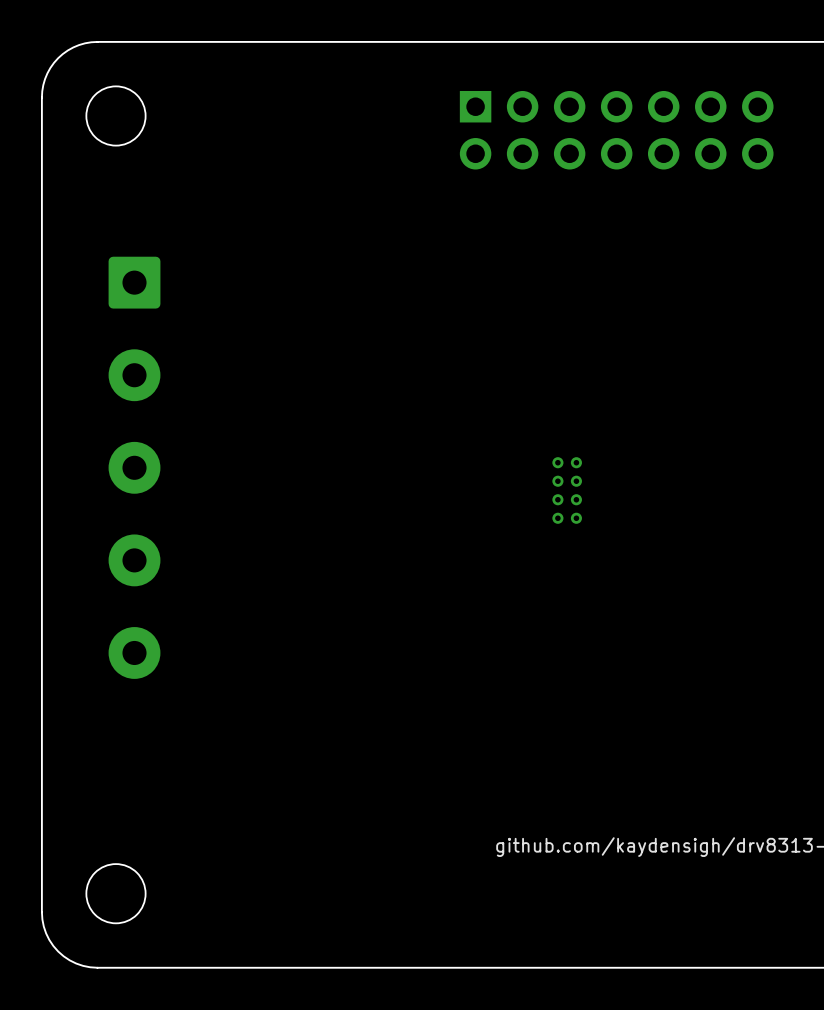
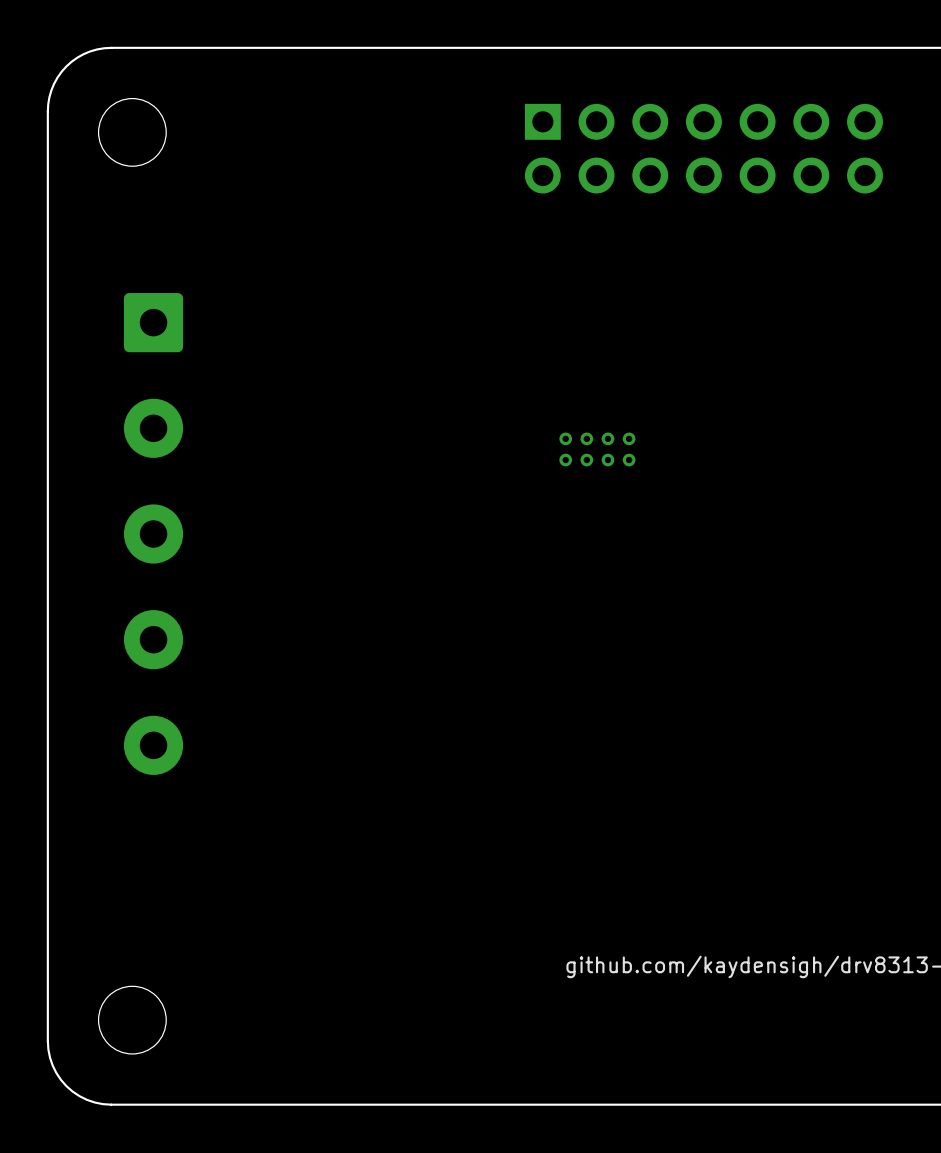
part rotation: 0° (567, 490) -> 90° clockwise (597, 449)
part position: (567, 490) -> (597, 449)

